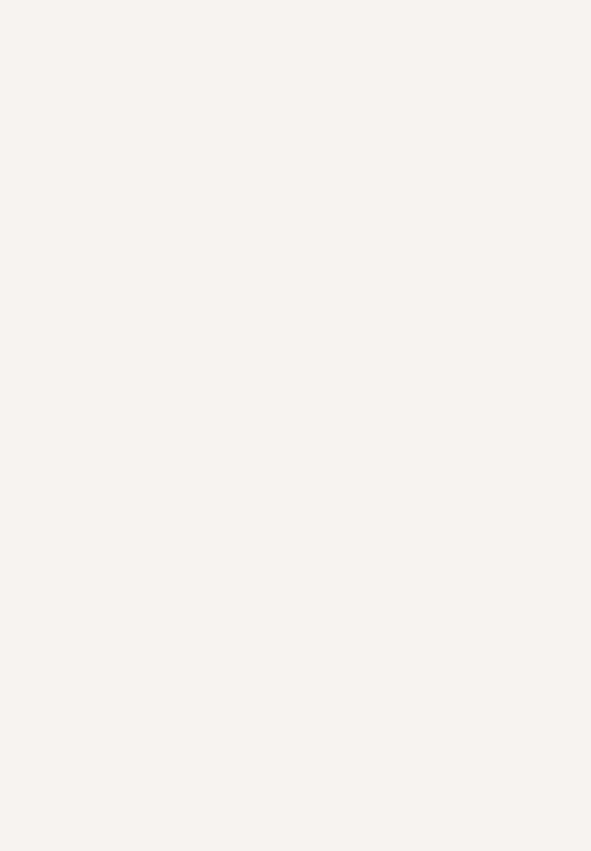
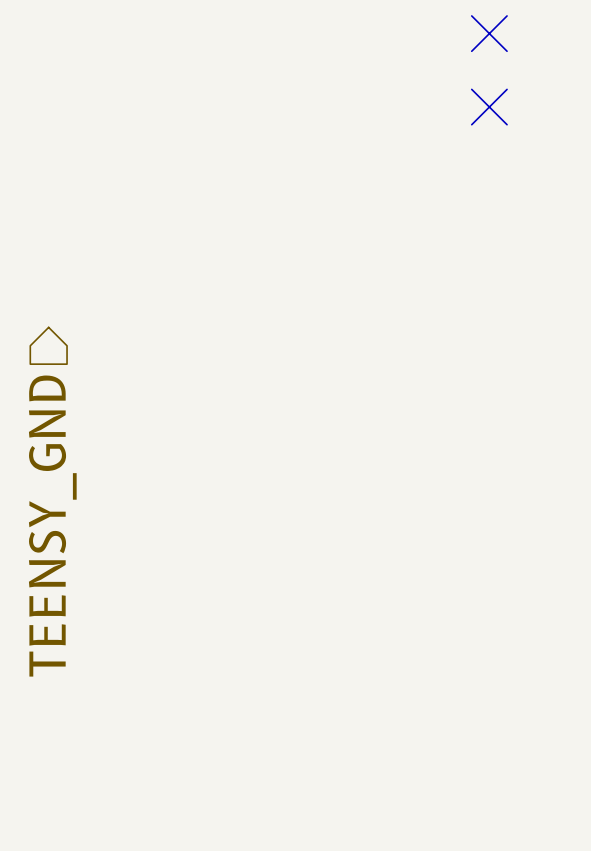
no-connect mark: none -> (489, 33)
no-connect mark: none -> (489, 107)
hierarchical label: none -> TEENSY_GND (52, 526)

